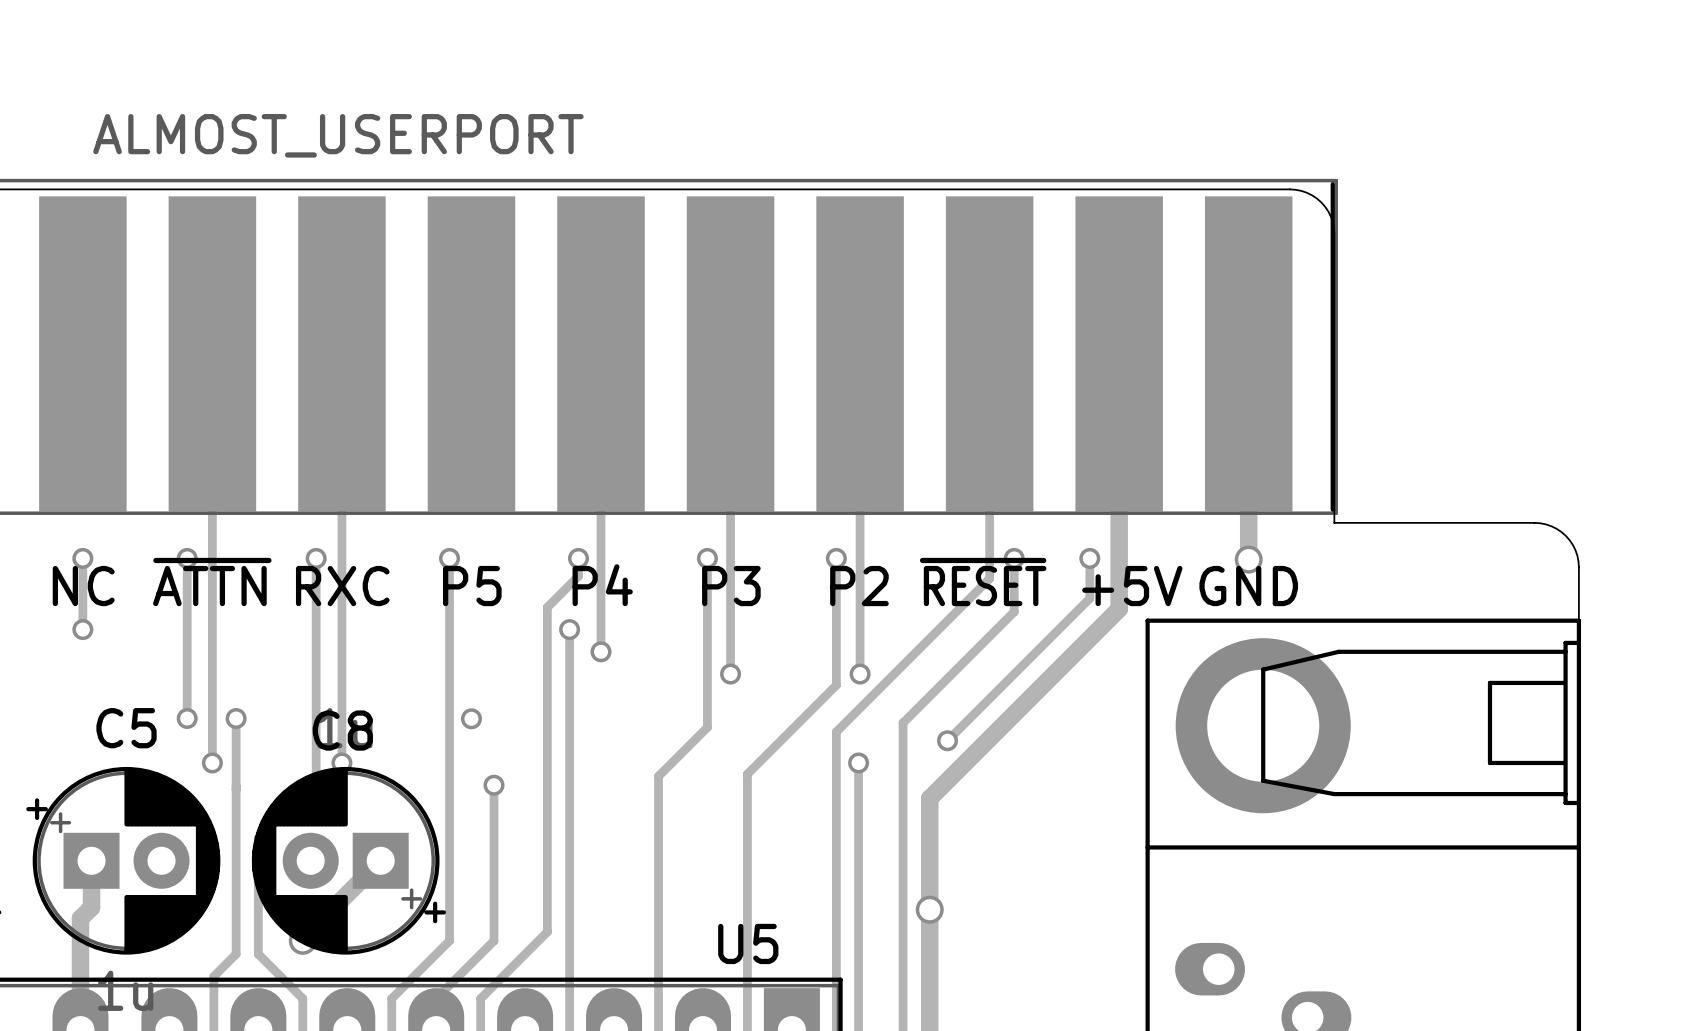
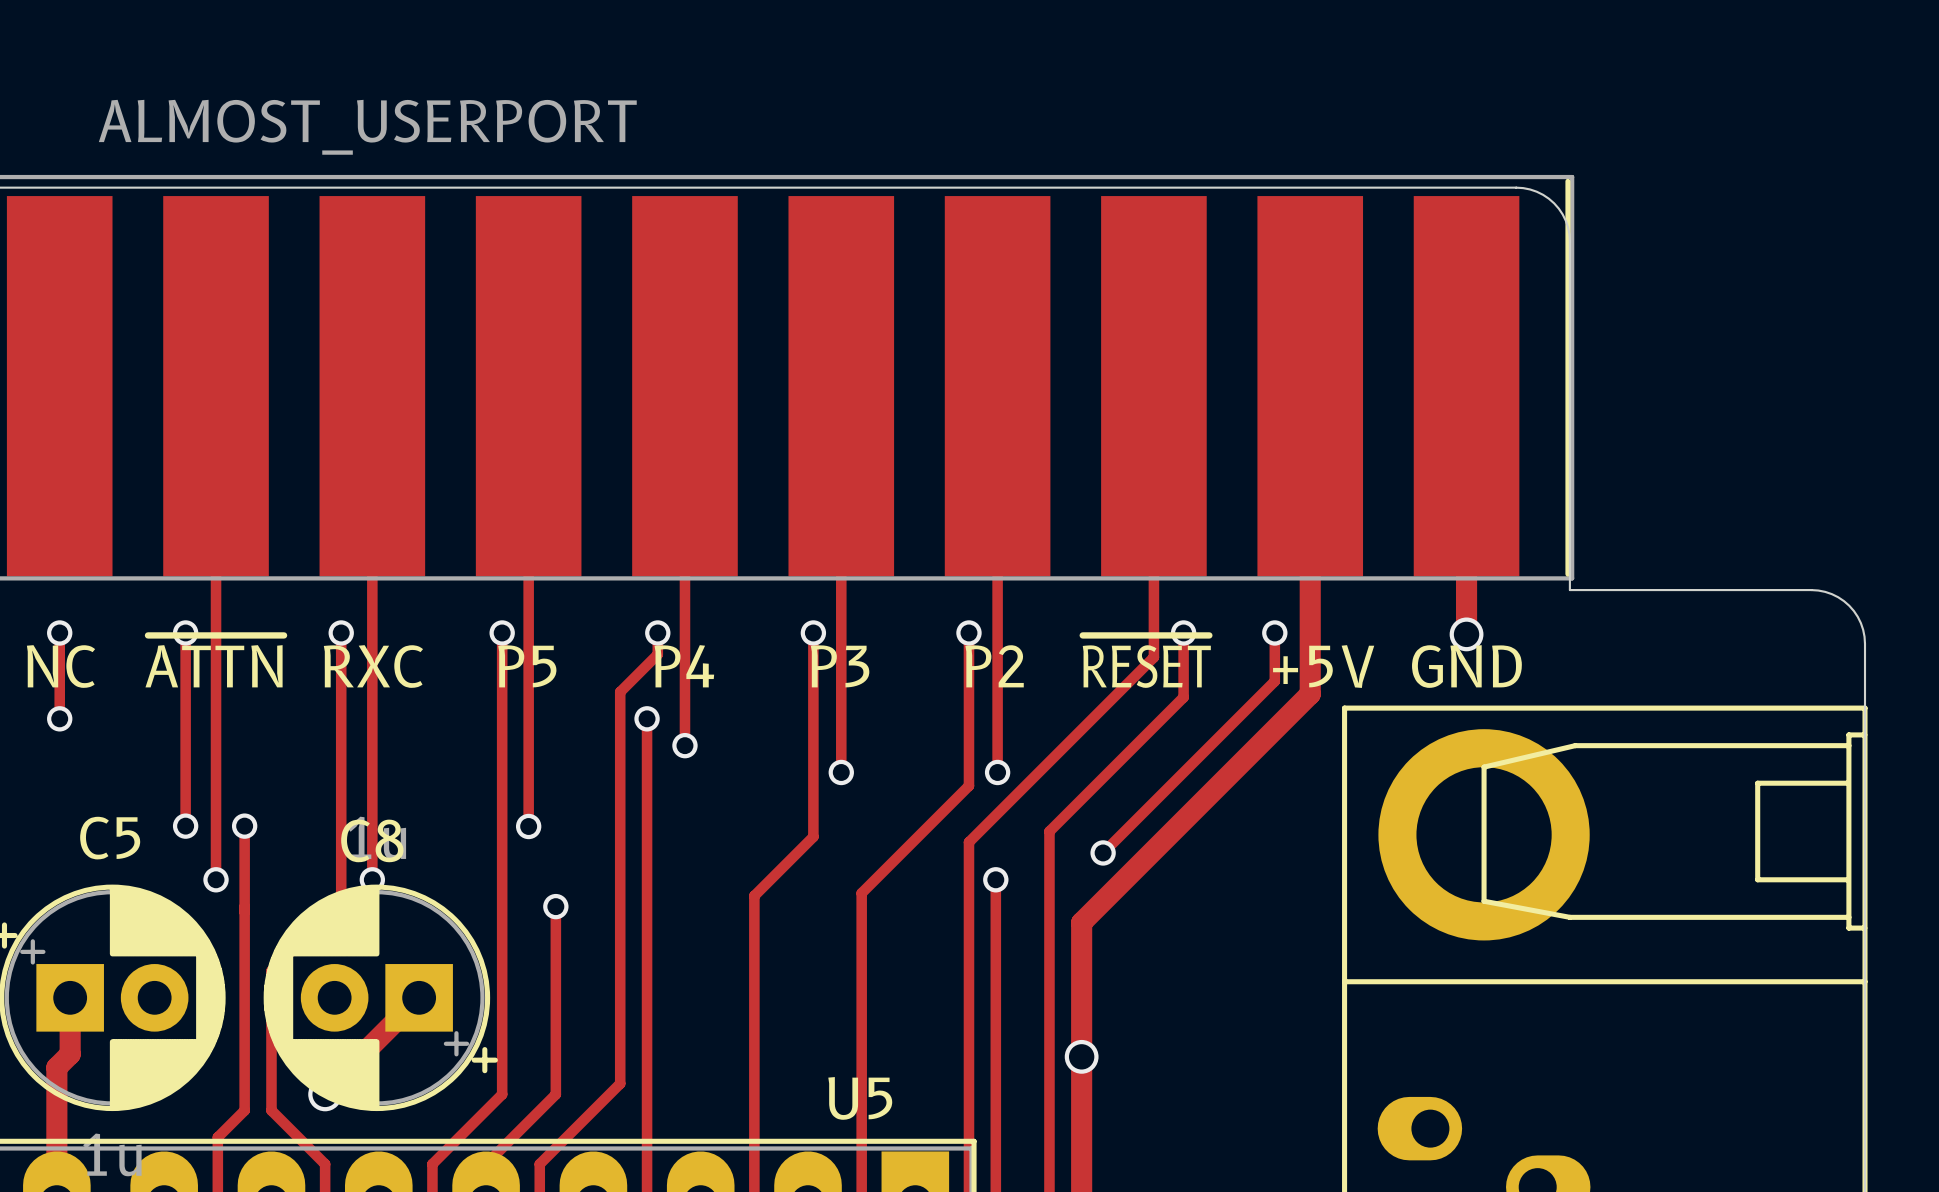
track: none -> (528, 386) (528, 826)

